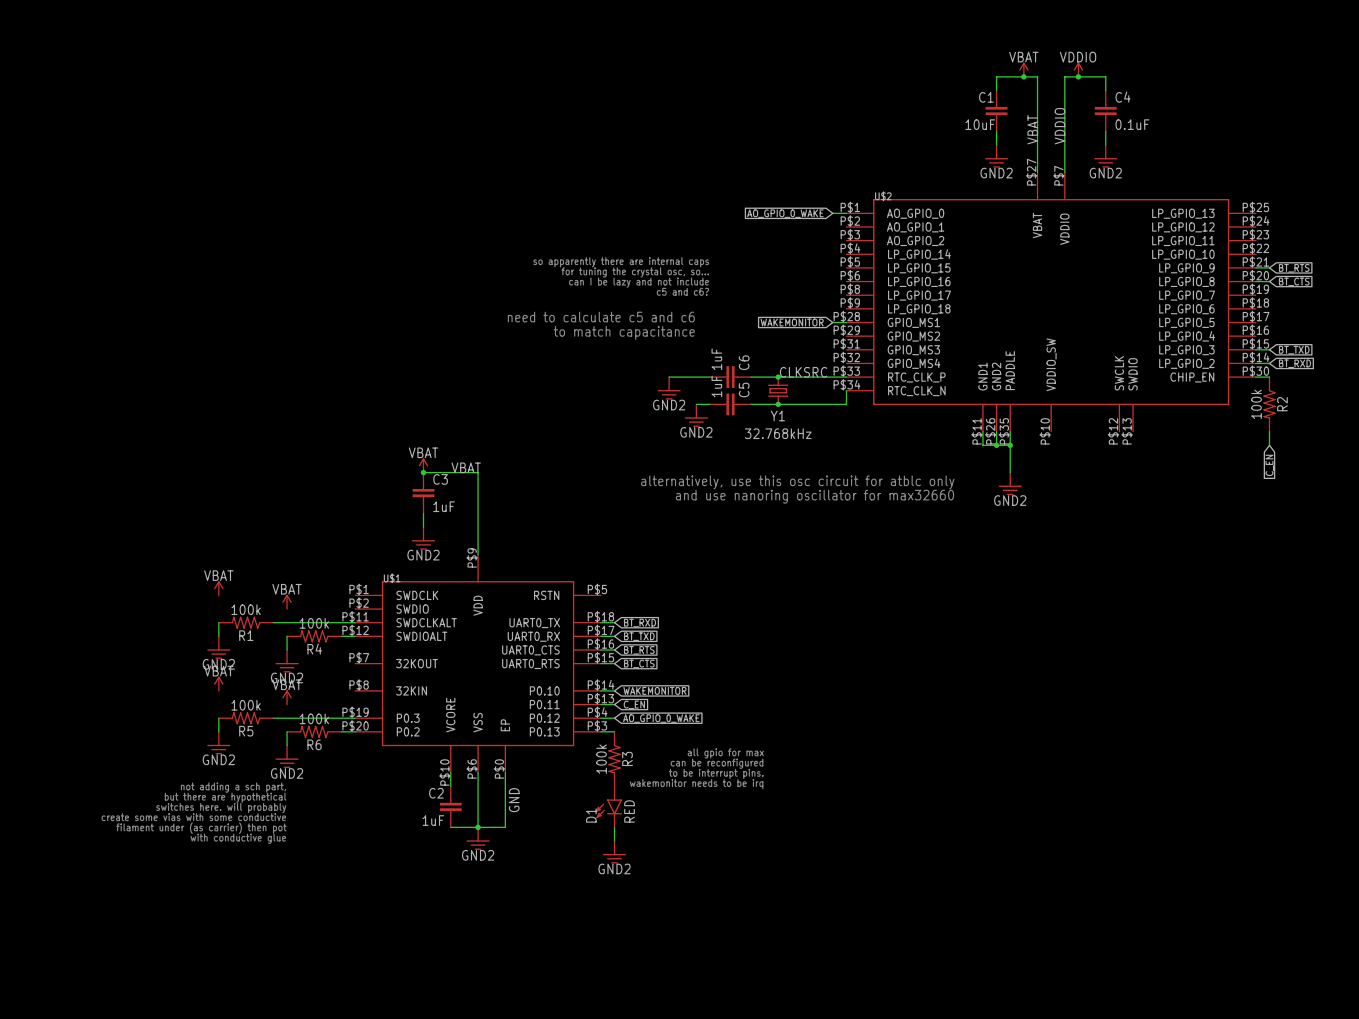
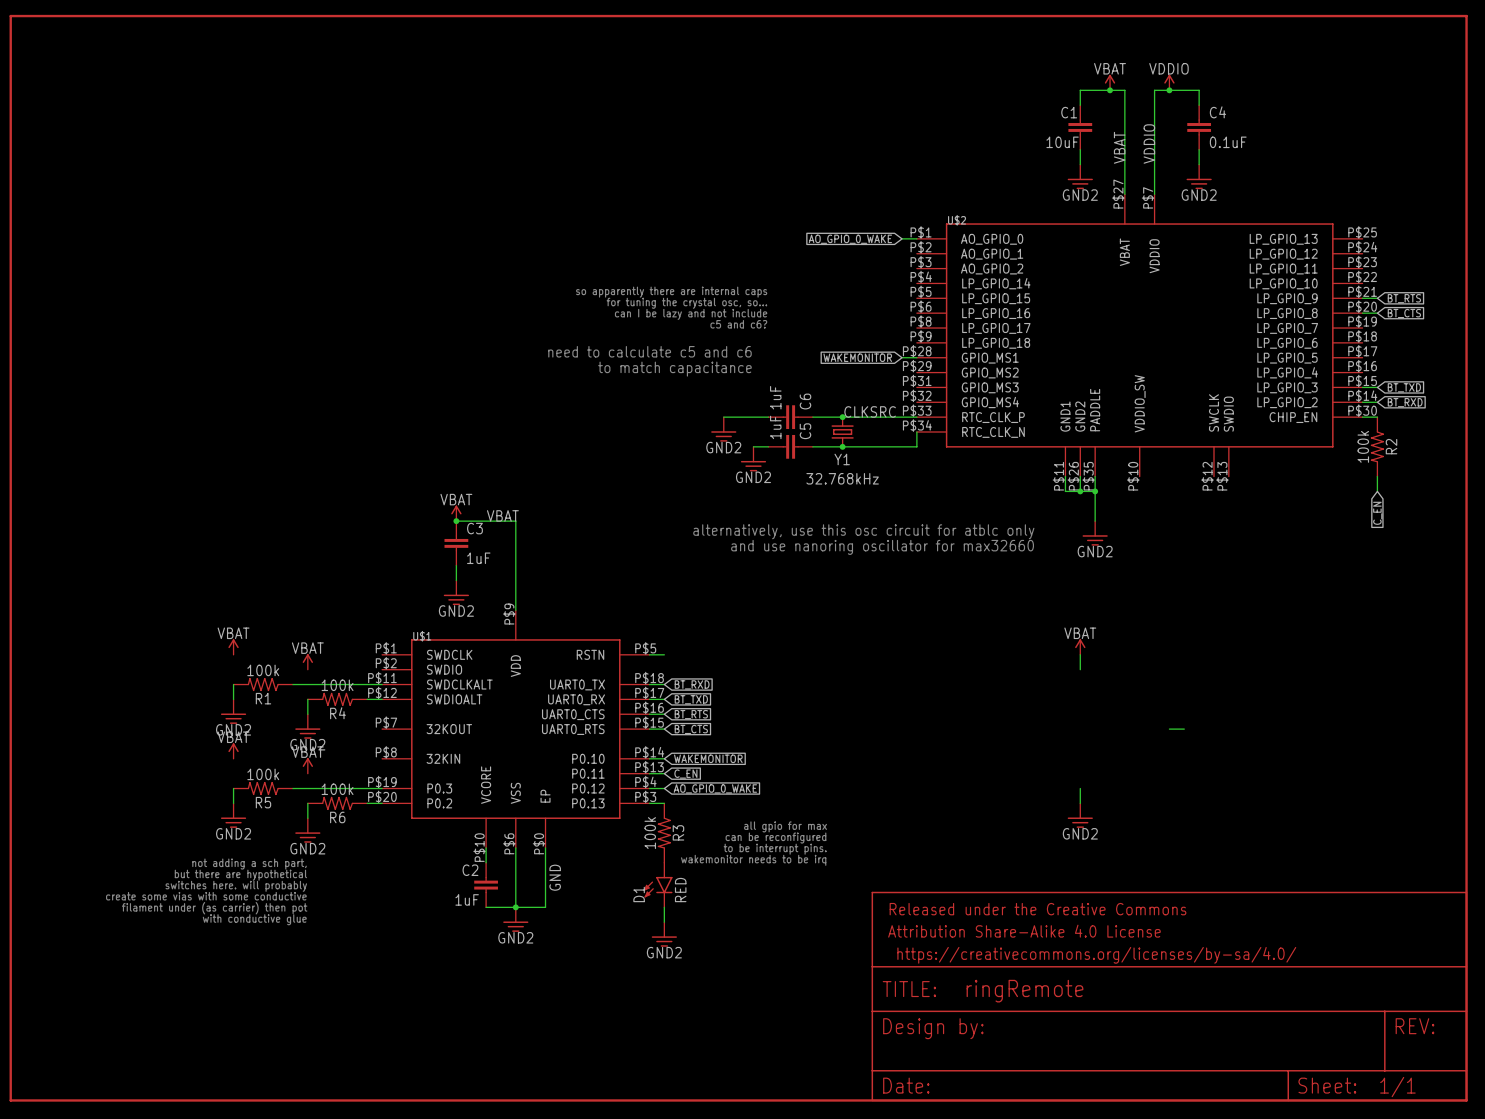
part: none -> (738, 558)
power symbol: none -> VBAT (1080, 647)
wire: none -> (649, 654) (664, 654)
wire: none -> (1080, 654) (1080, 669)
wire: none -> (1169, 729) (1184, 729)
wire: none -> (1080, 788) (1080, 803)
power symbol: none -> GND2 (1080, 815)
part: none -> (1169, 996)

